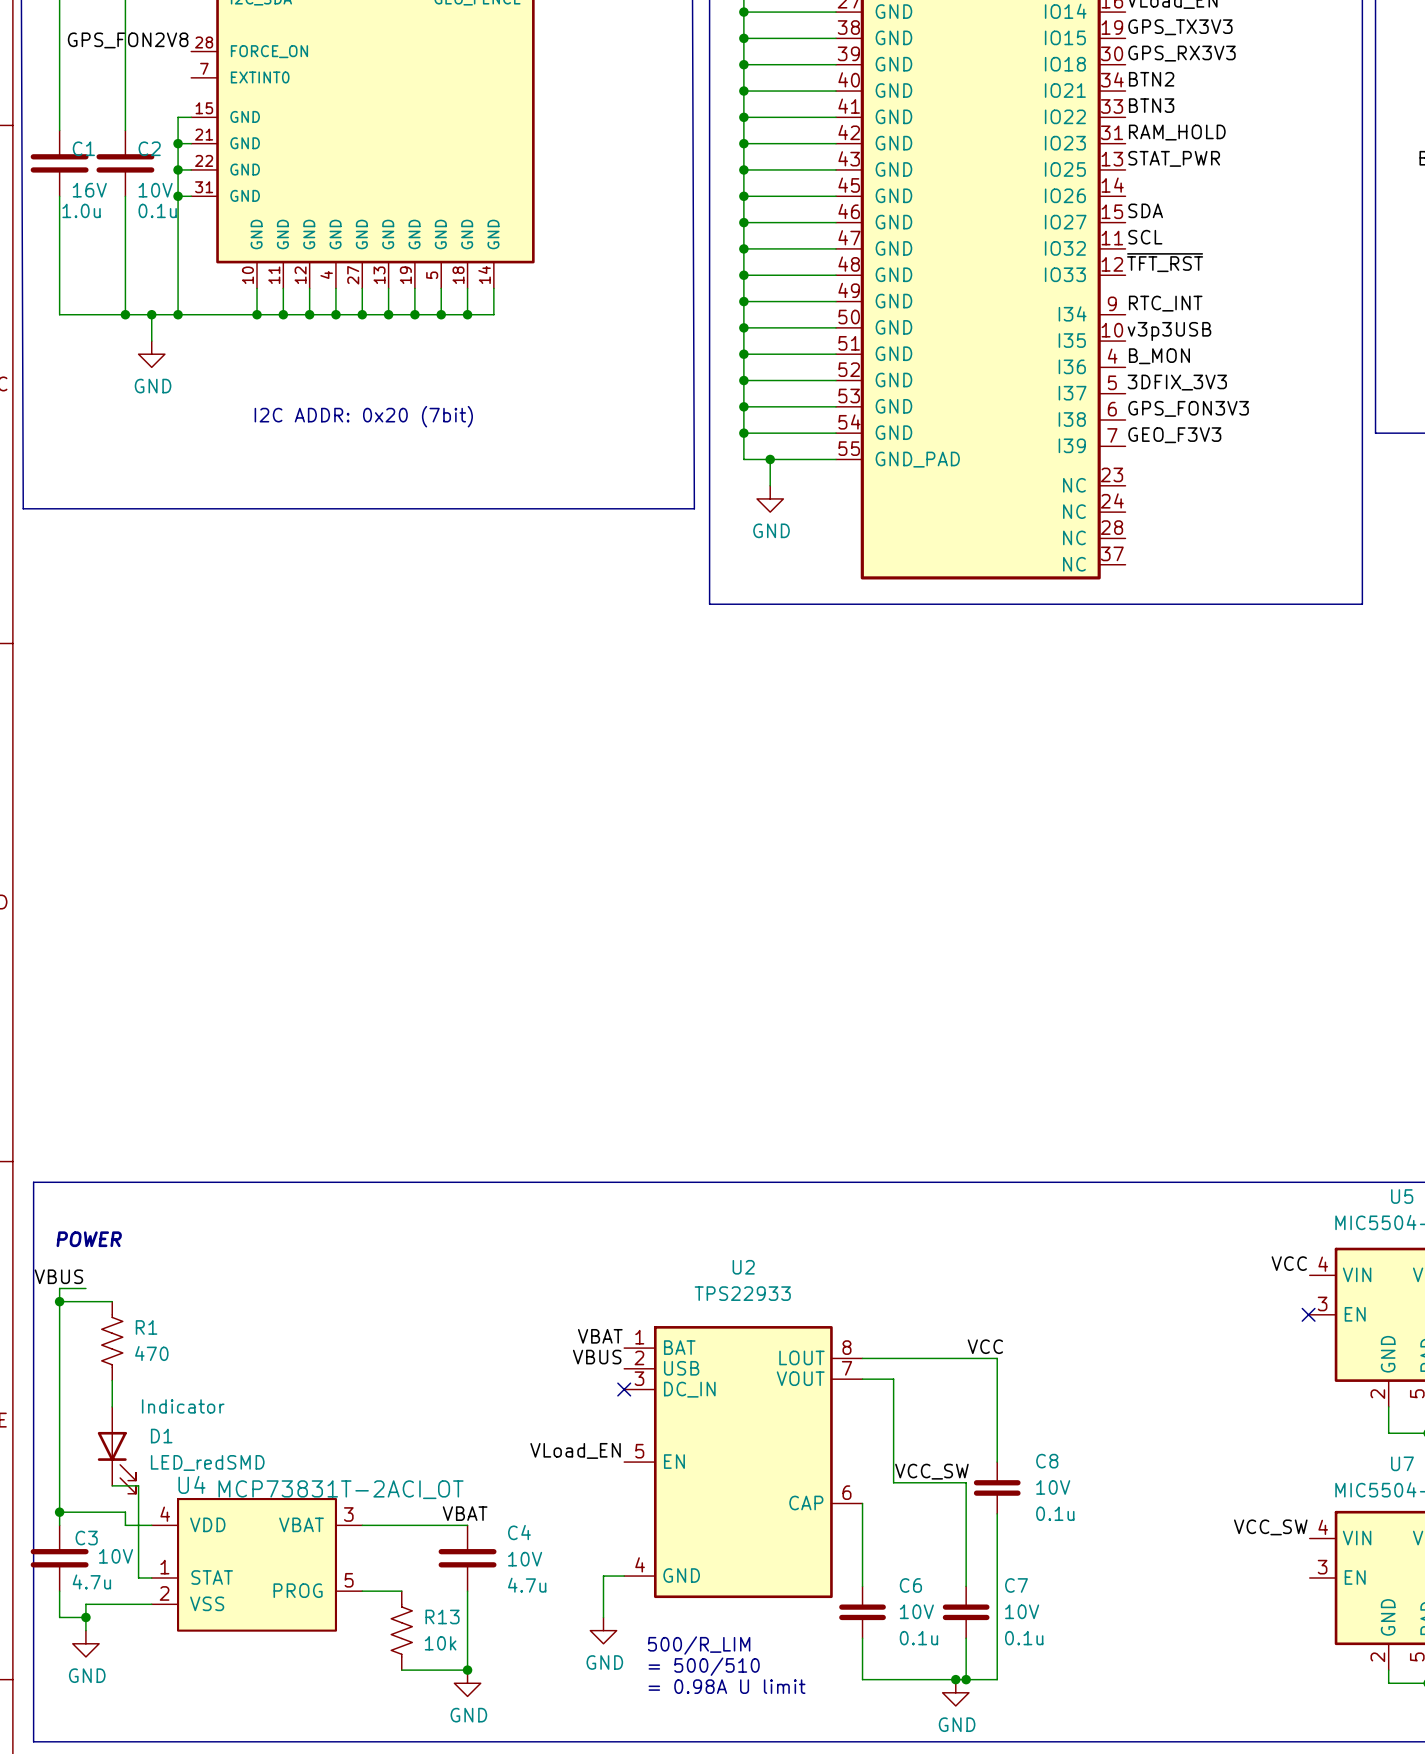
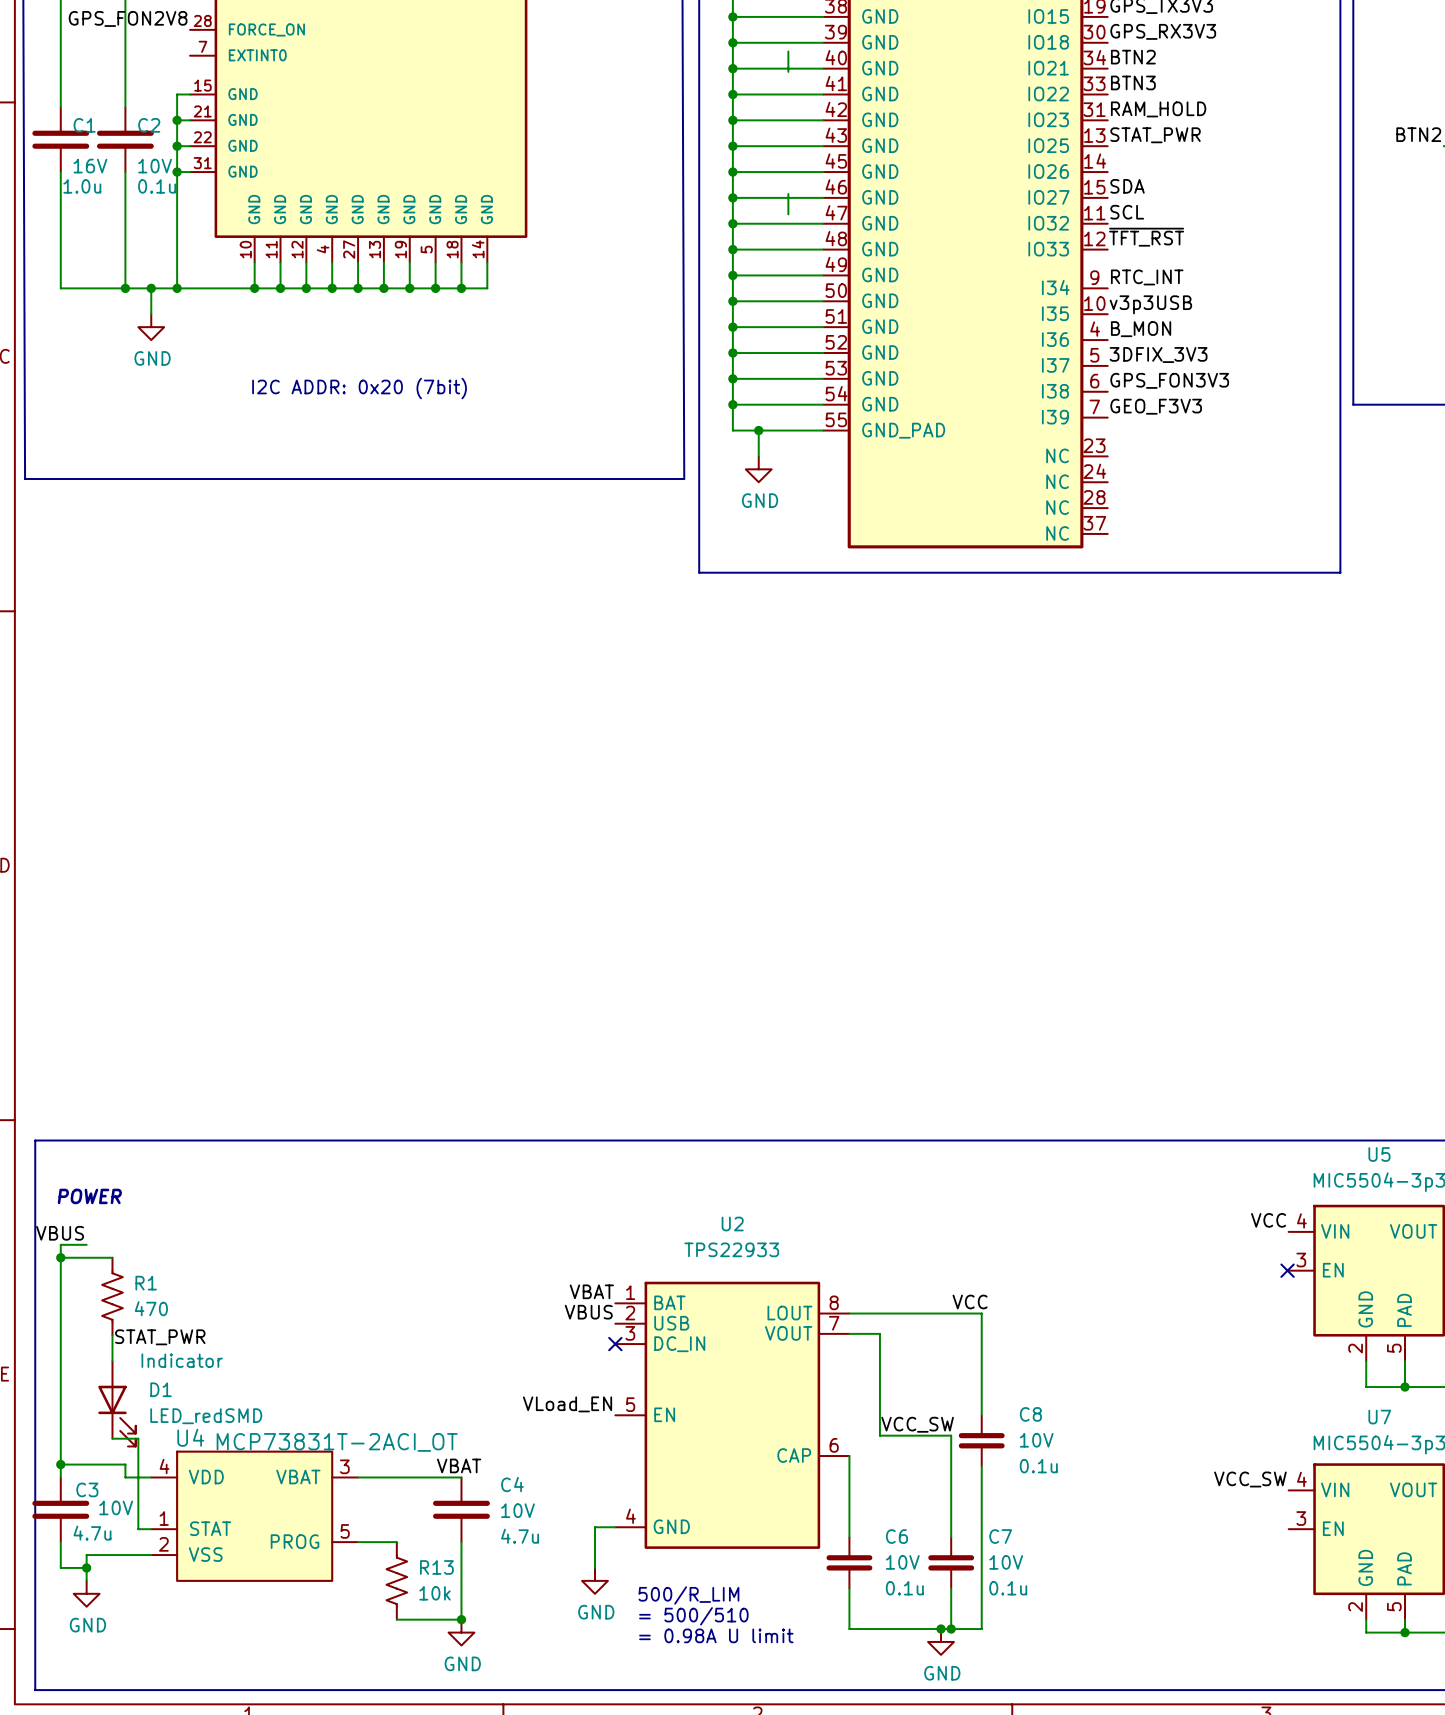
wire: none -> (788, 51) (788, 71)
wire: none -> (788, 194) (788, 214)
label: none -> STAT_PWR (160, 1337)

